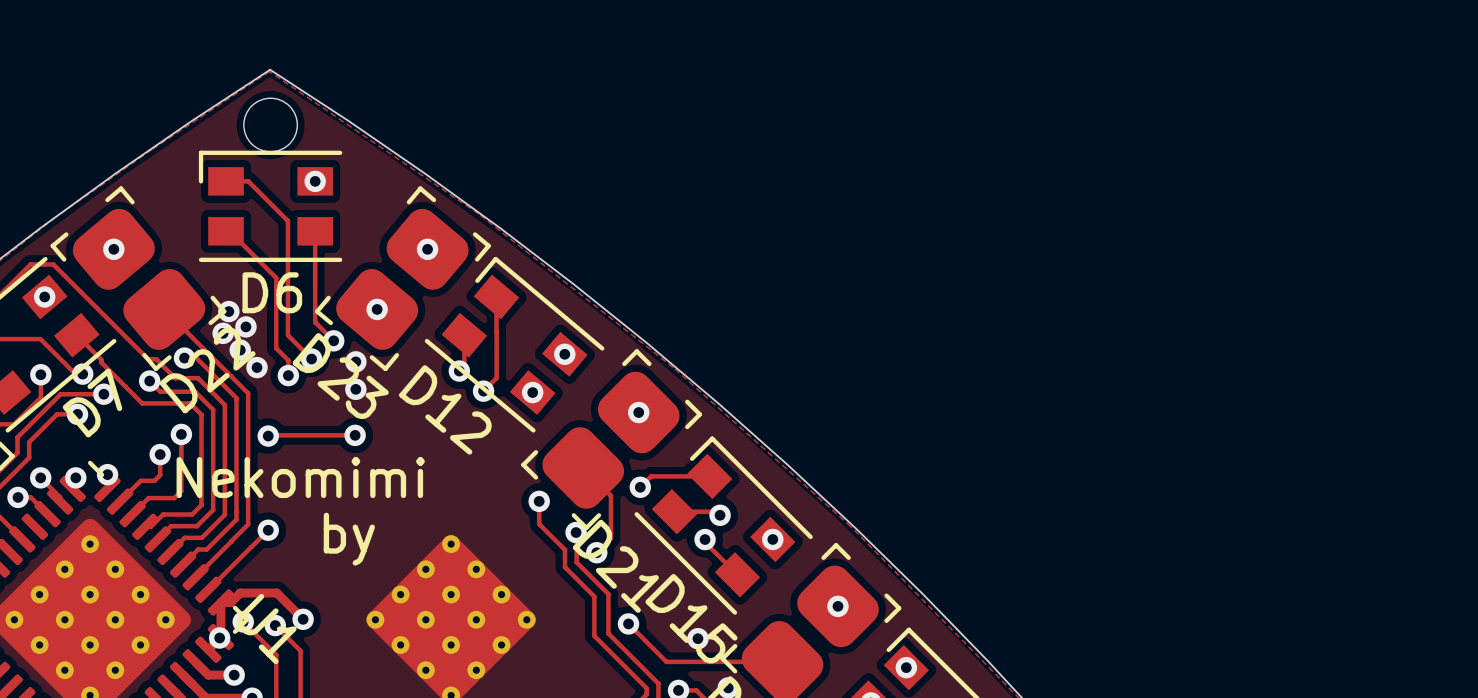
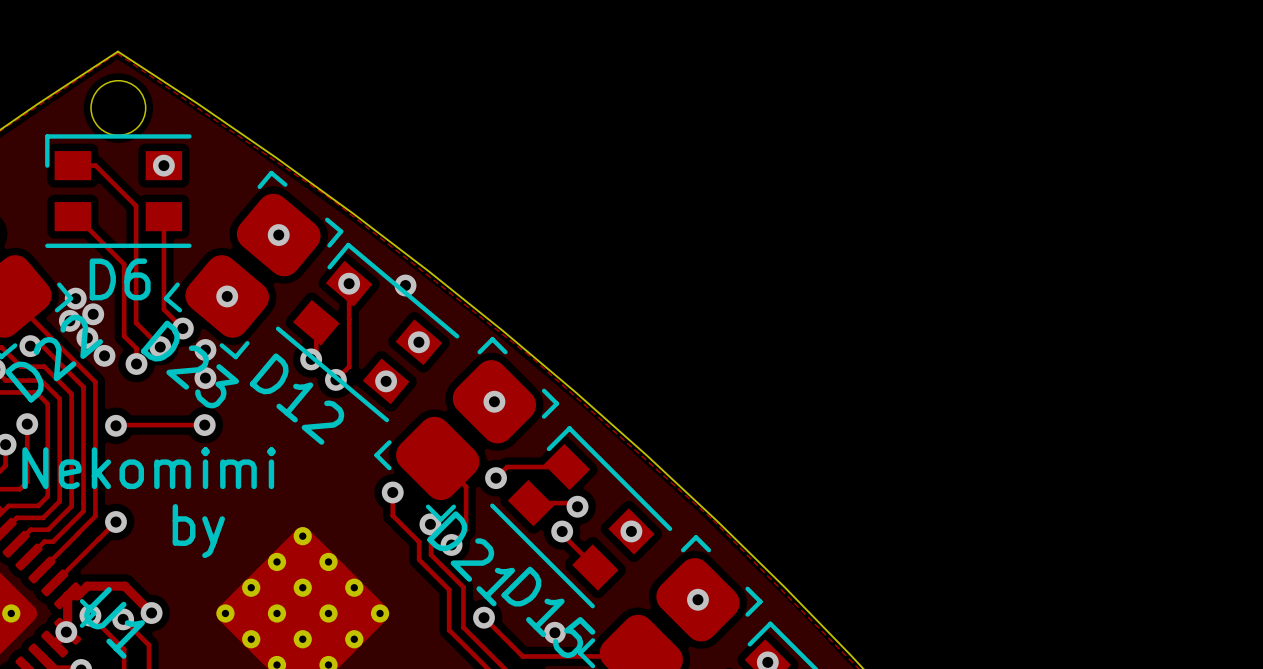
via: none -> (349, 283)
via: none -> (405, 285)

